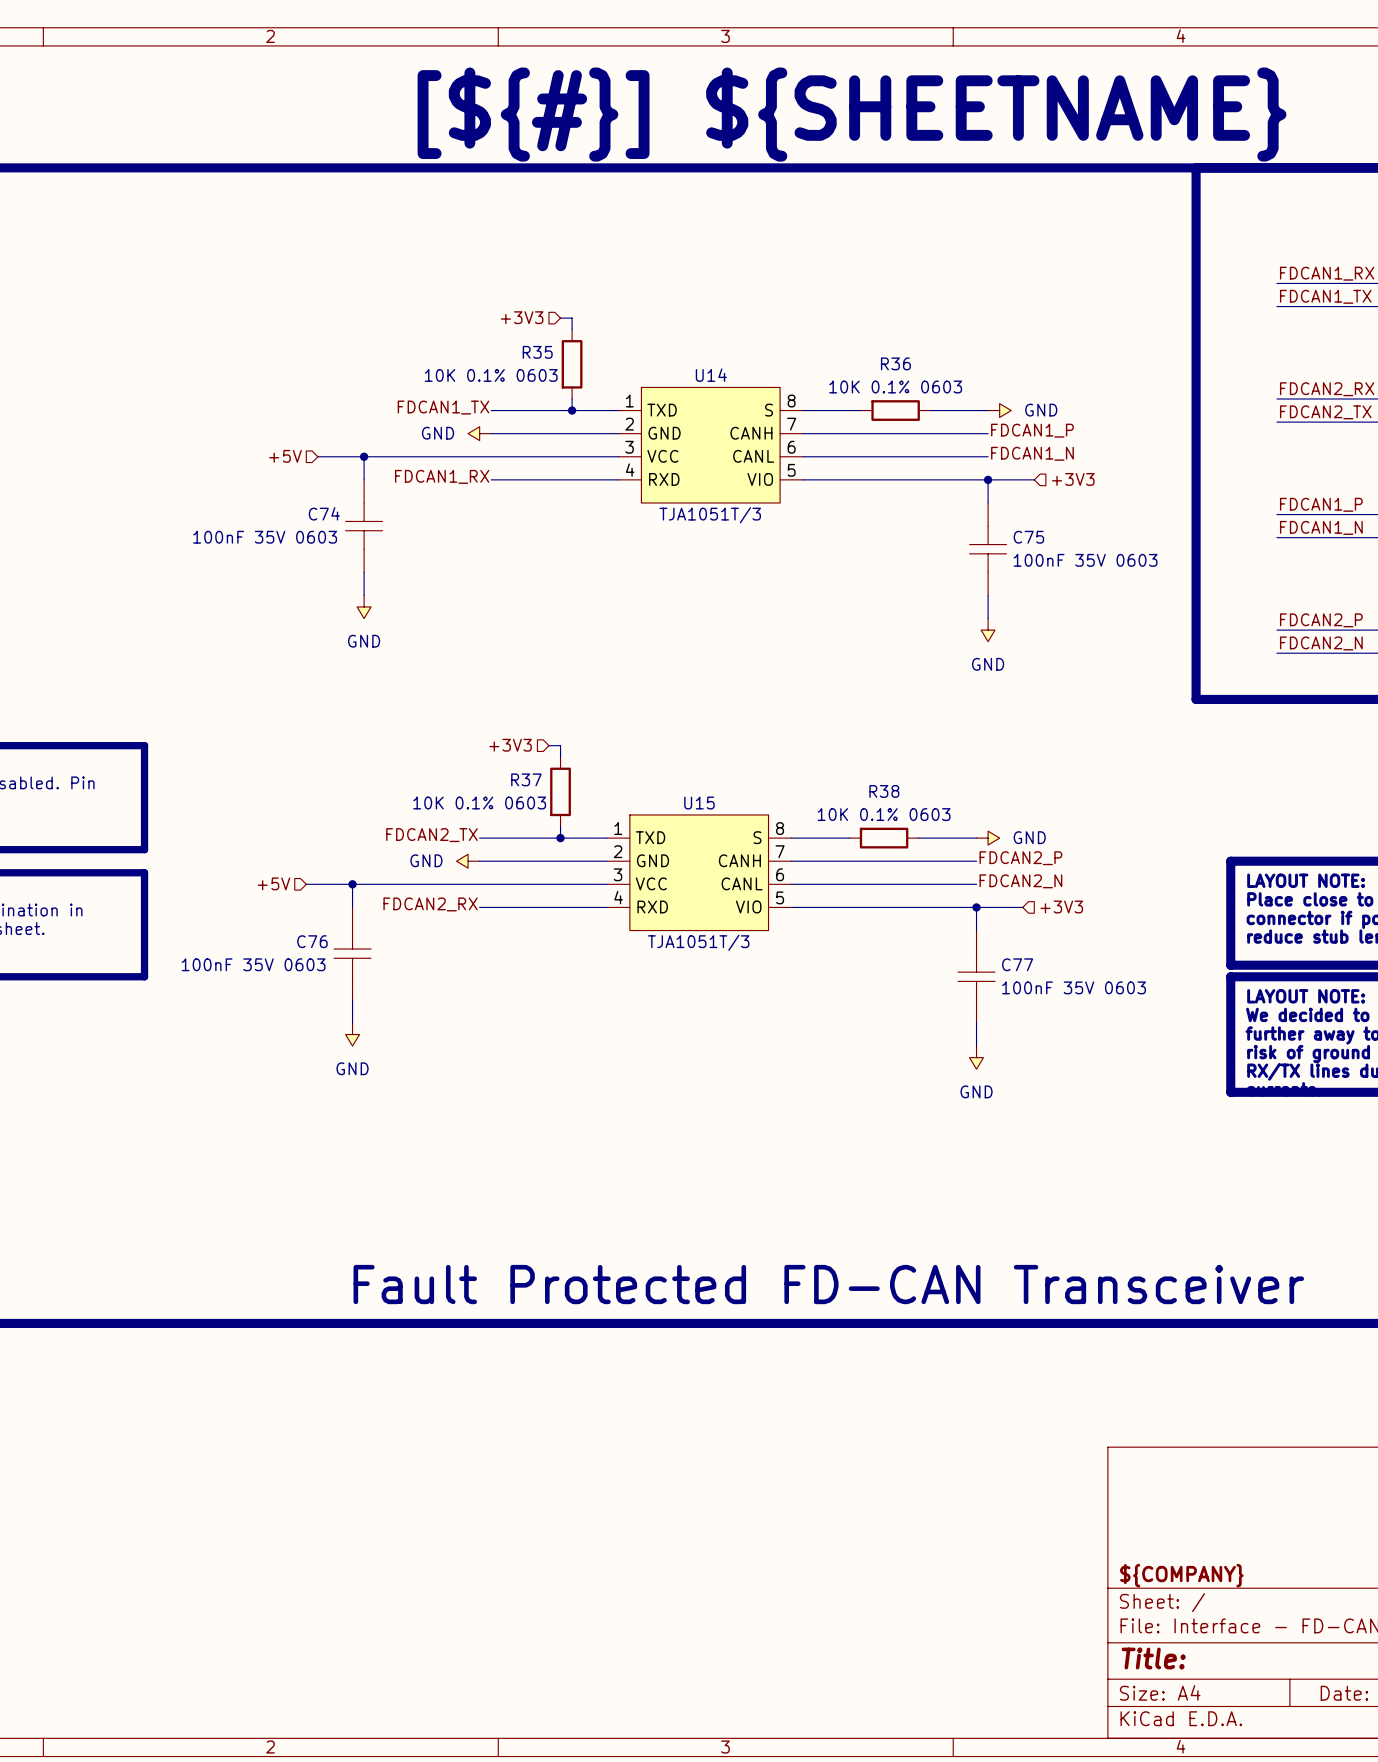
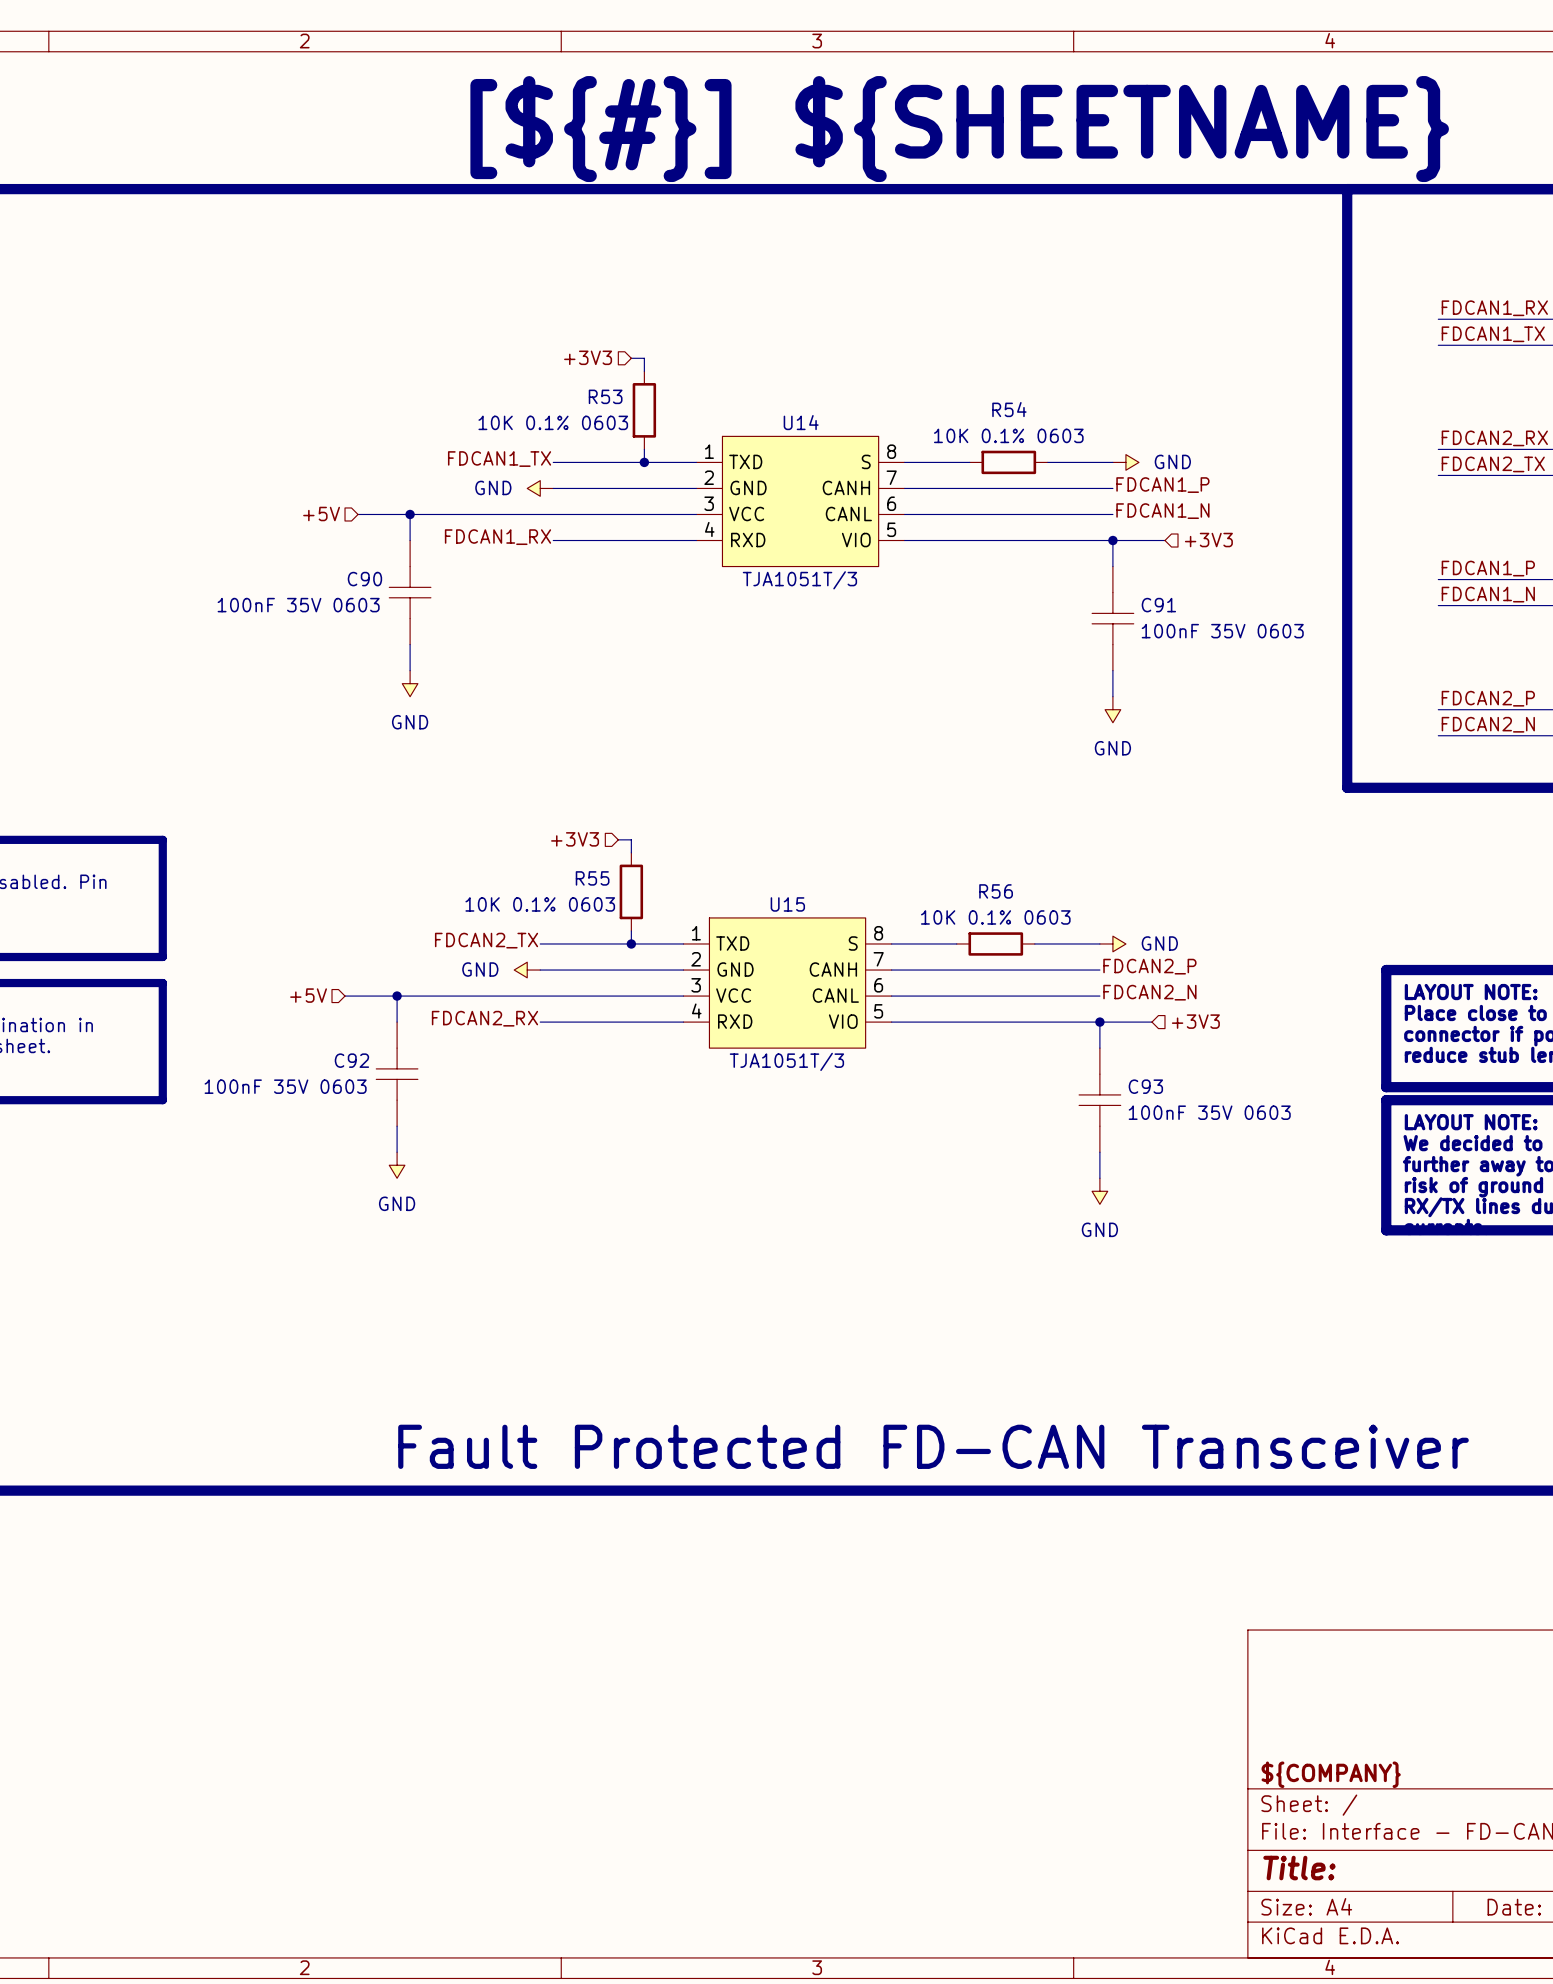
R35 name: R35 (537, 352) -> R53 (605, 396)
R36 name: R36 (895, 363) -> R54 (1009, 409)
C74 name: C74 (324, 513) -> C90 (364, 579)
C75 name: C75 (1028, 537) -> C91 (1158, 605)
R37 name: R37 (526, 779) -> R55 (592, 878)
R38 name: R38 (884, 791) -> R56 (996, 891)
C76 name: C76 (312, 941) -> C92 (351, 1060)
C77 name: C77 (1017, 964) -> C93 (1145, 1086)

